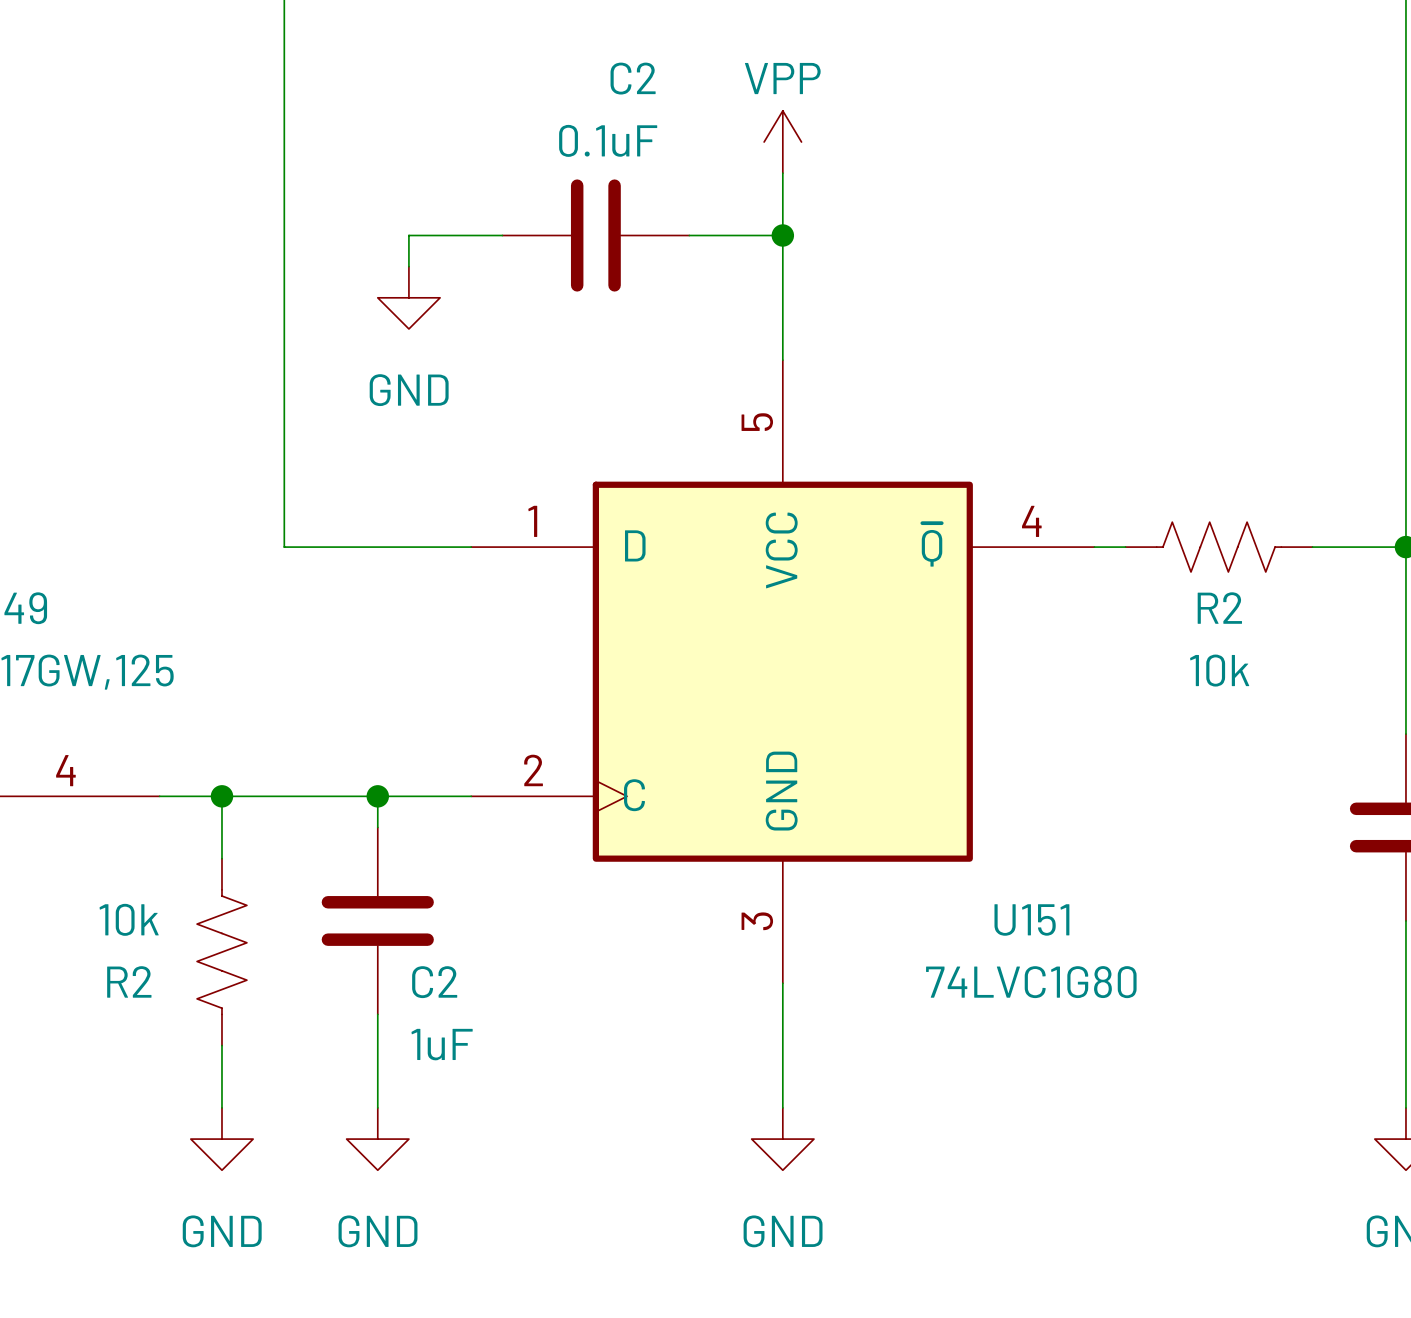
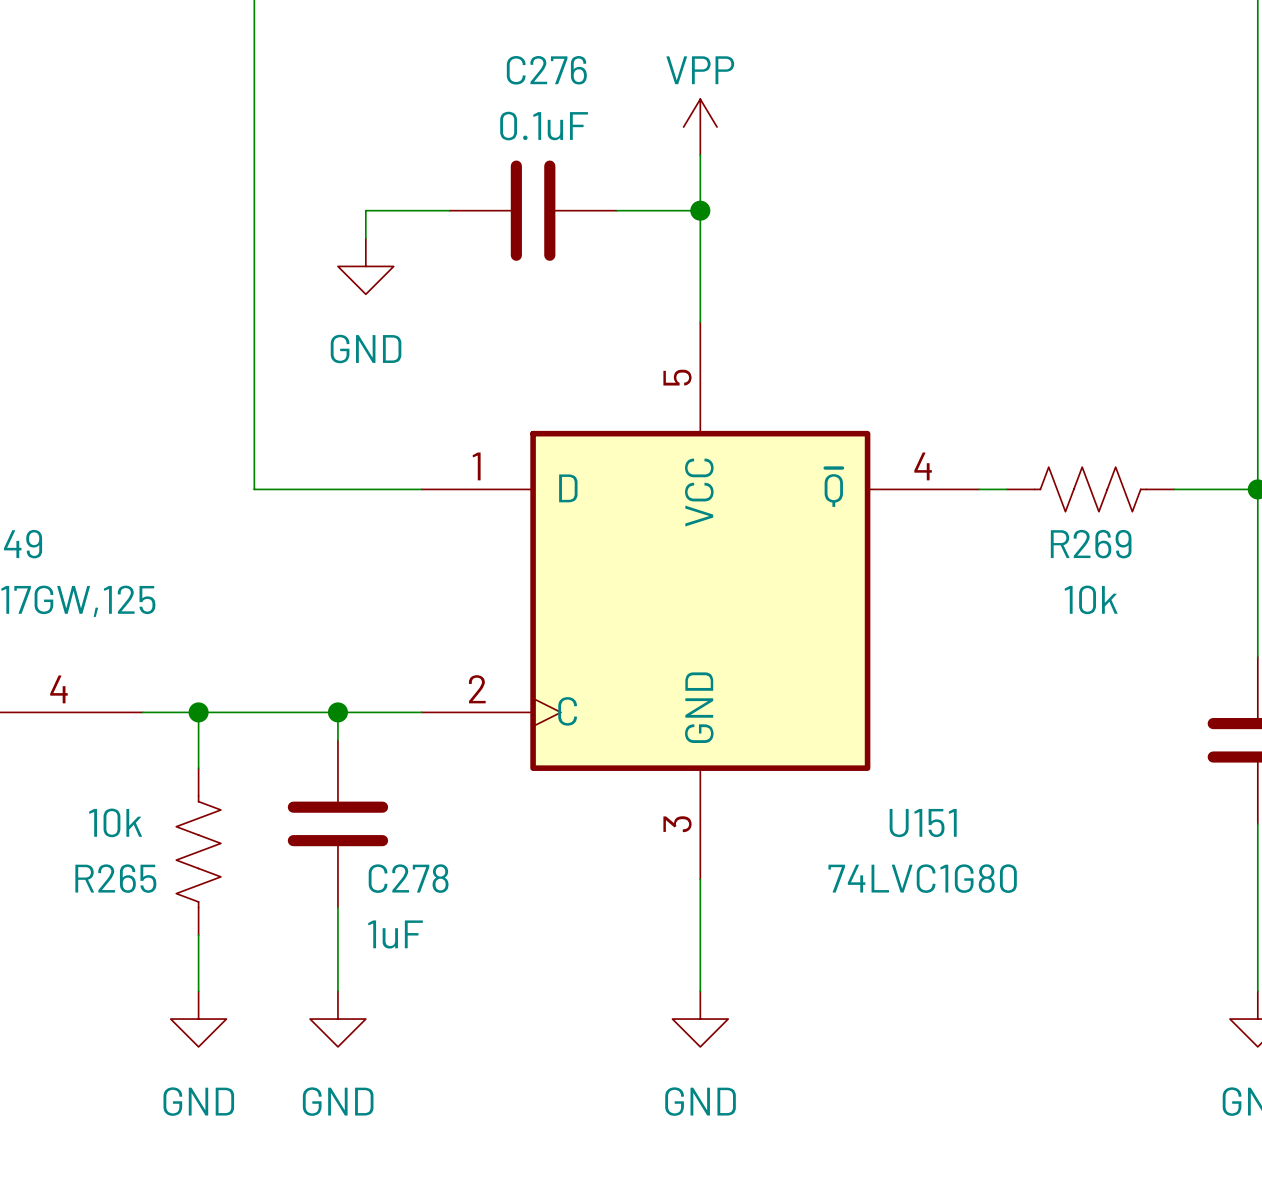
C2 name: C2 (633, 78) -> C276 (546, 70)
R2 name: R2 (1219, 608) -> R269 (1091, 544)
R2 name: R2 (129, 981) -> R265 (115, 878)
C2 name: C2 (434, 982) -> C278 (408, 878)

